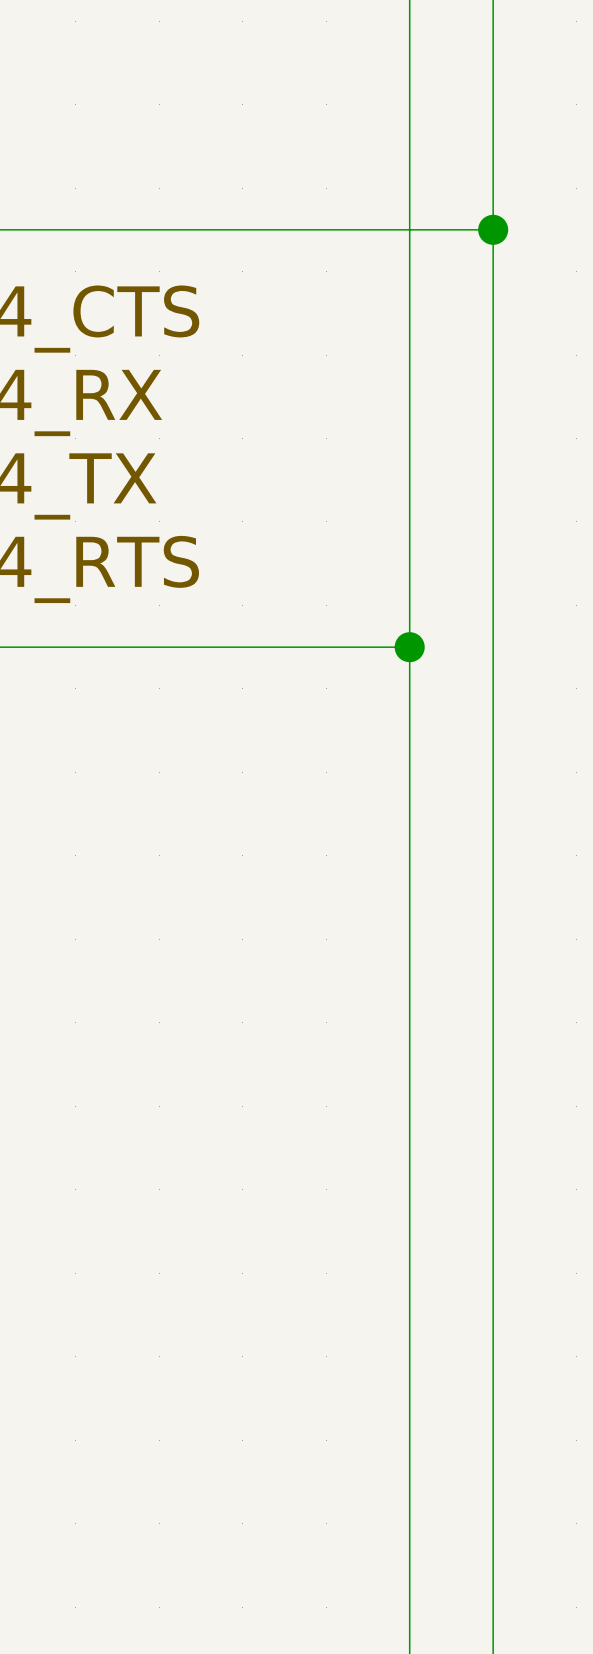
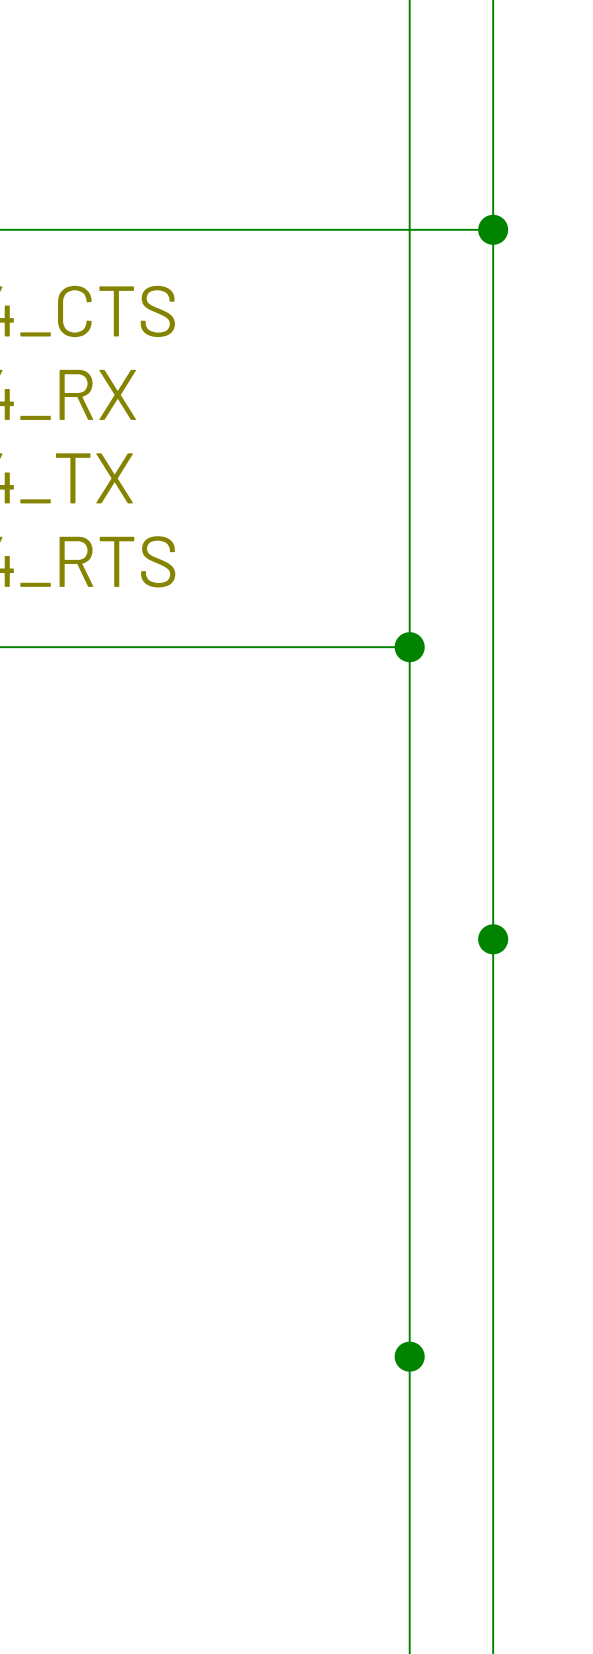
junction: none -> (493, 939)
junction: none -> (409, 1356)

